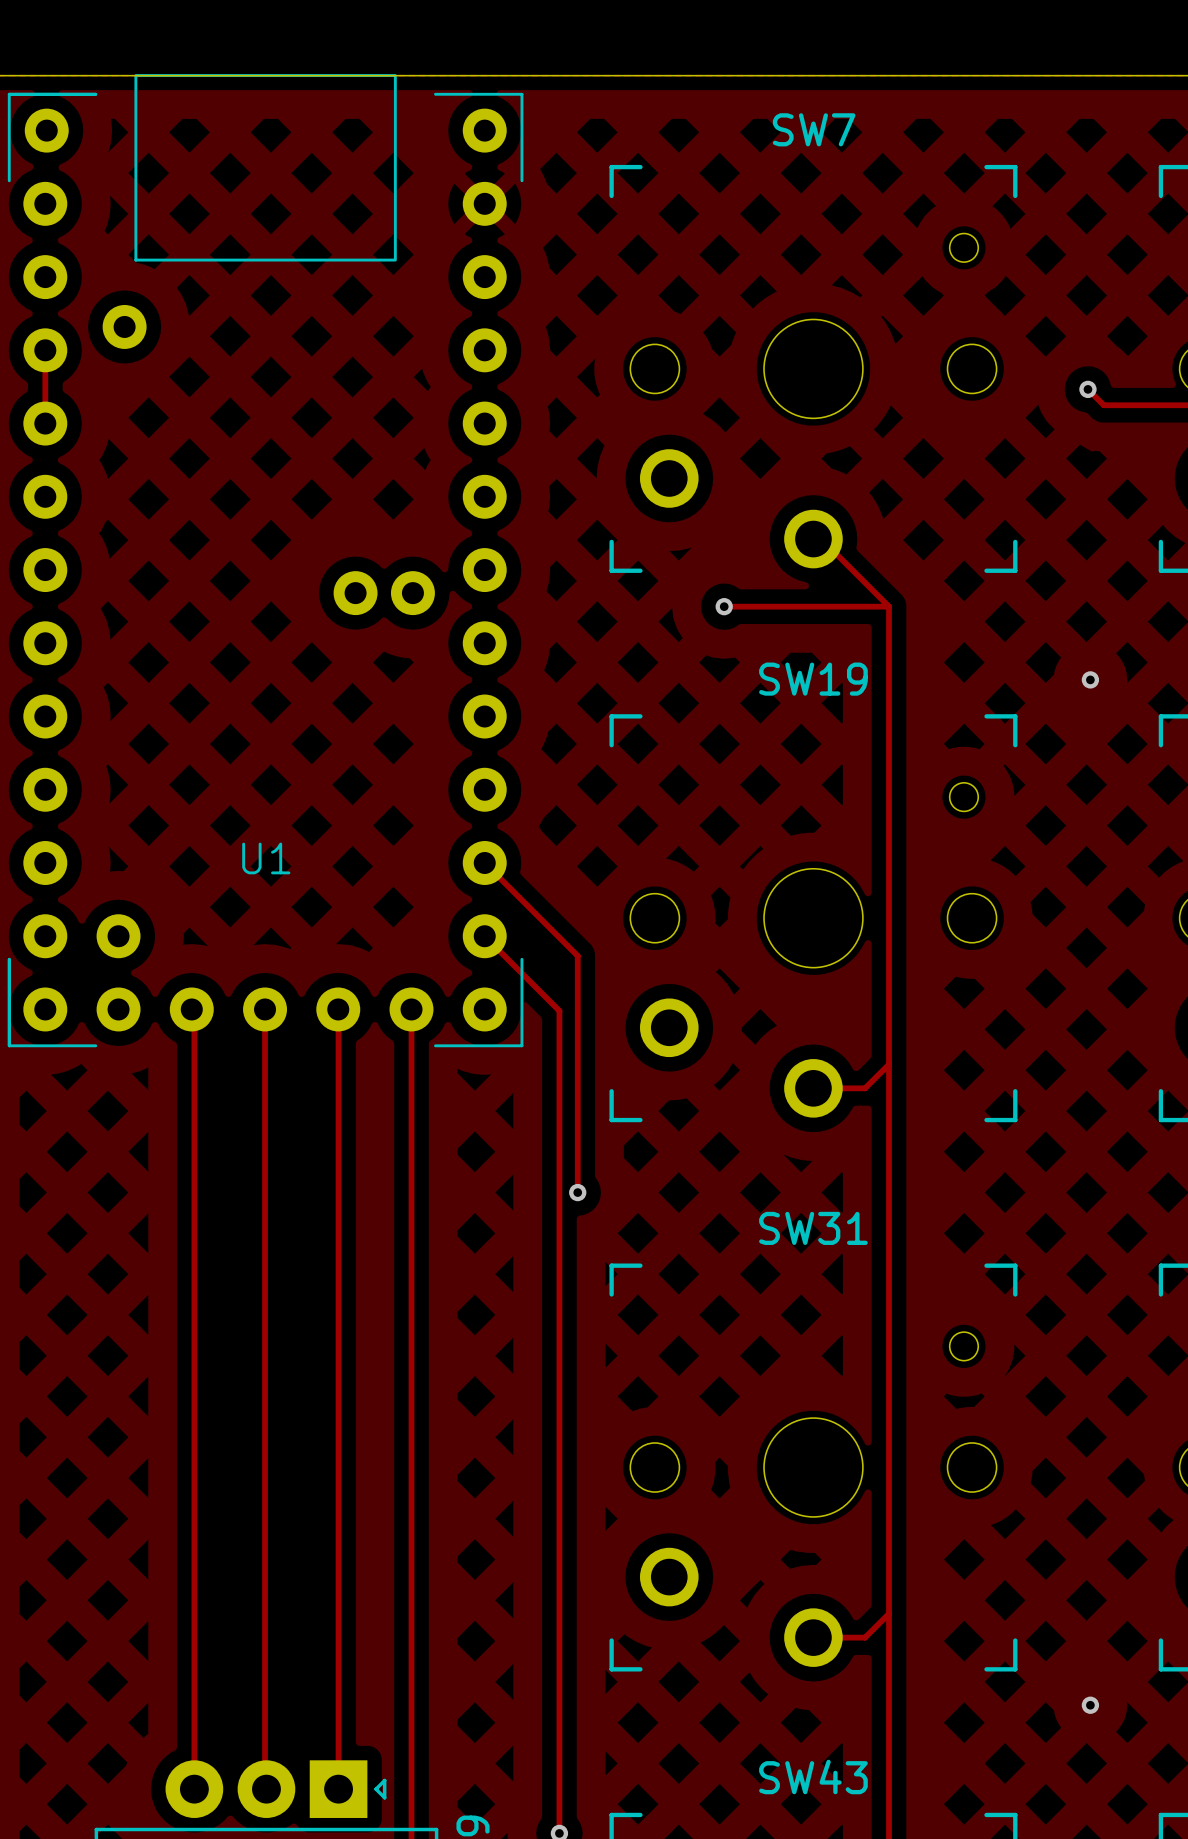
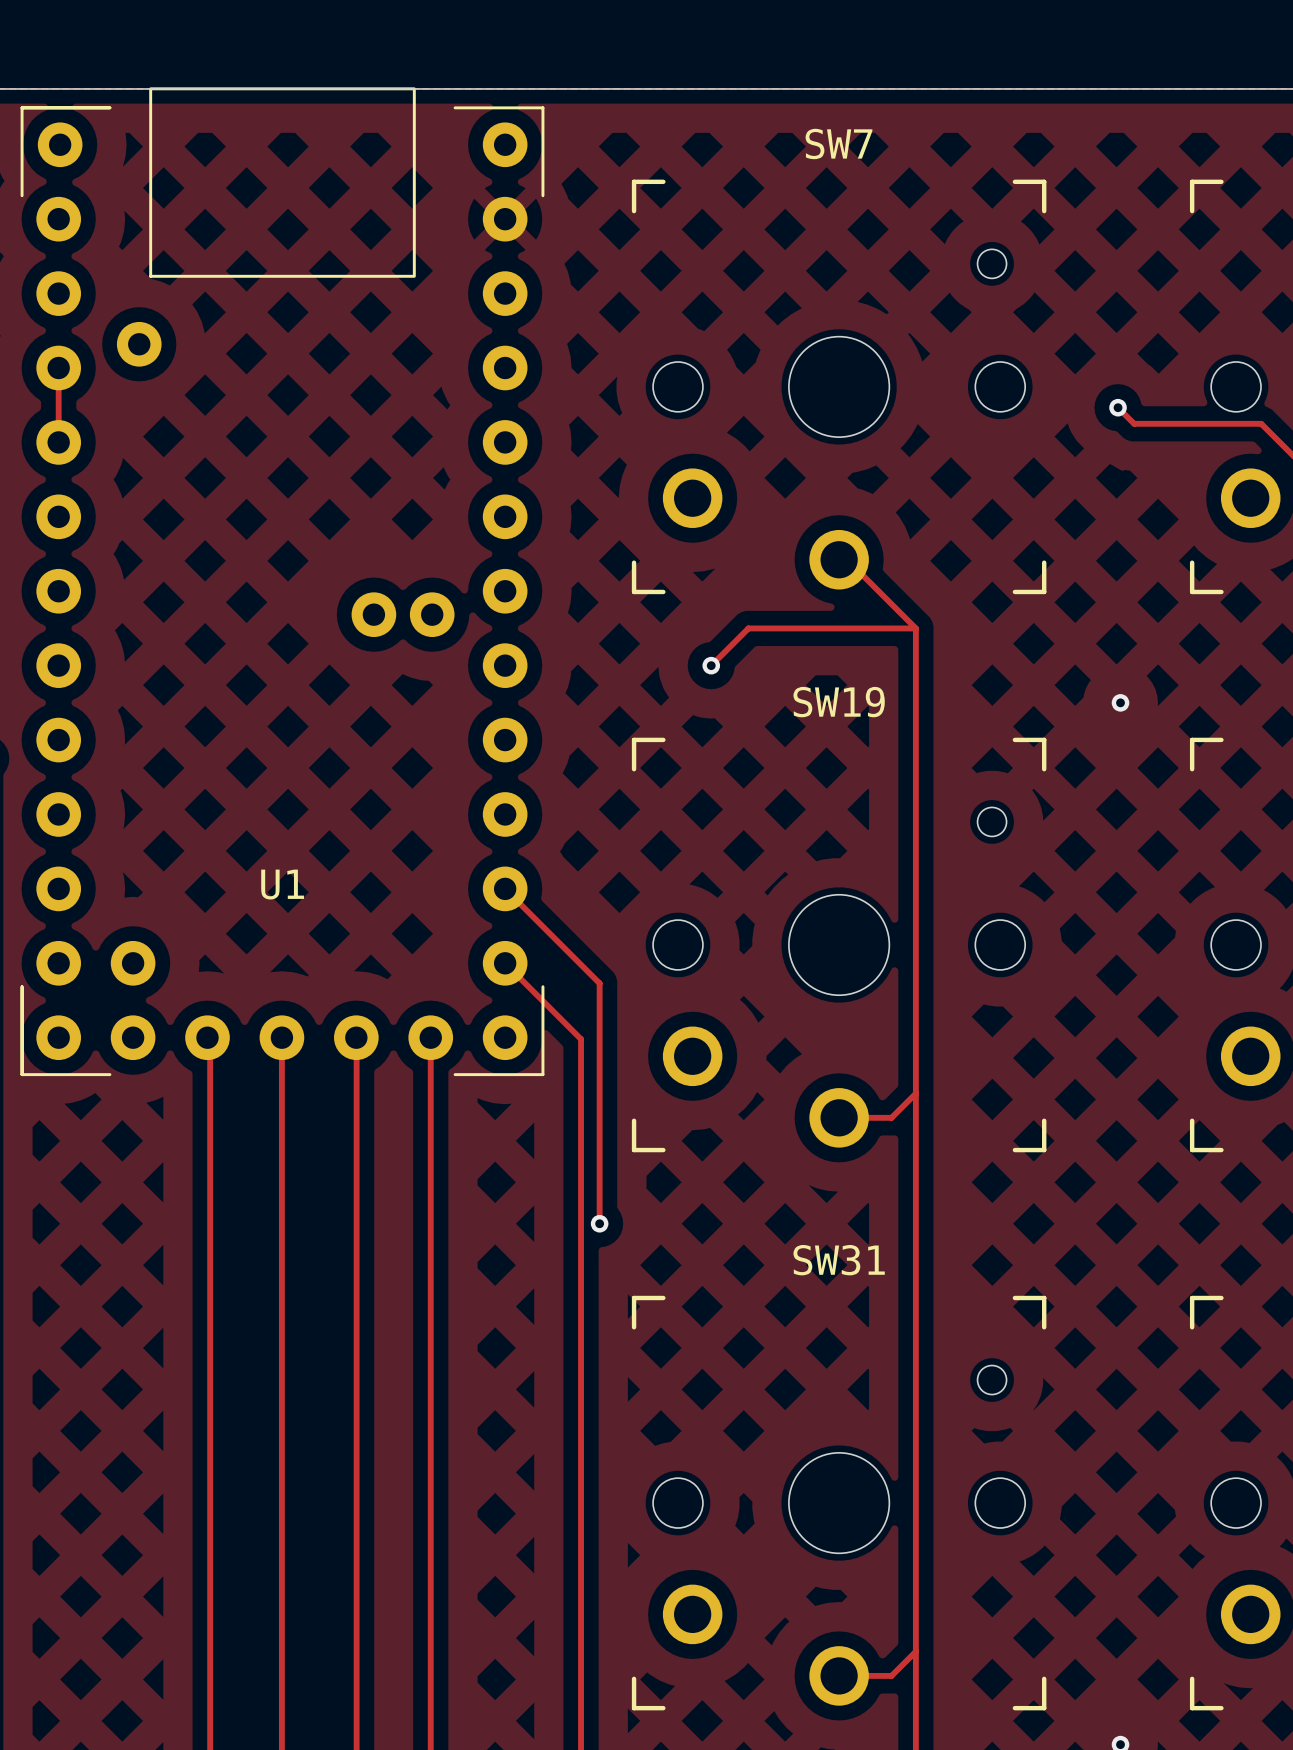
track: none -> (748, 628) (711, 665)
via position: (724, 606) -> (711, 665)

